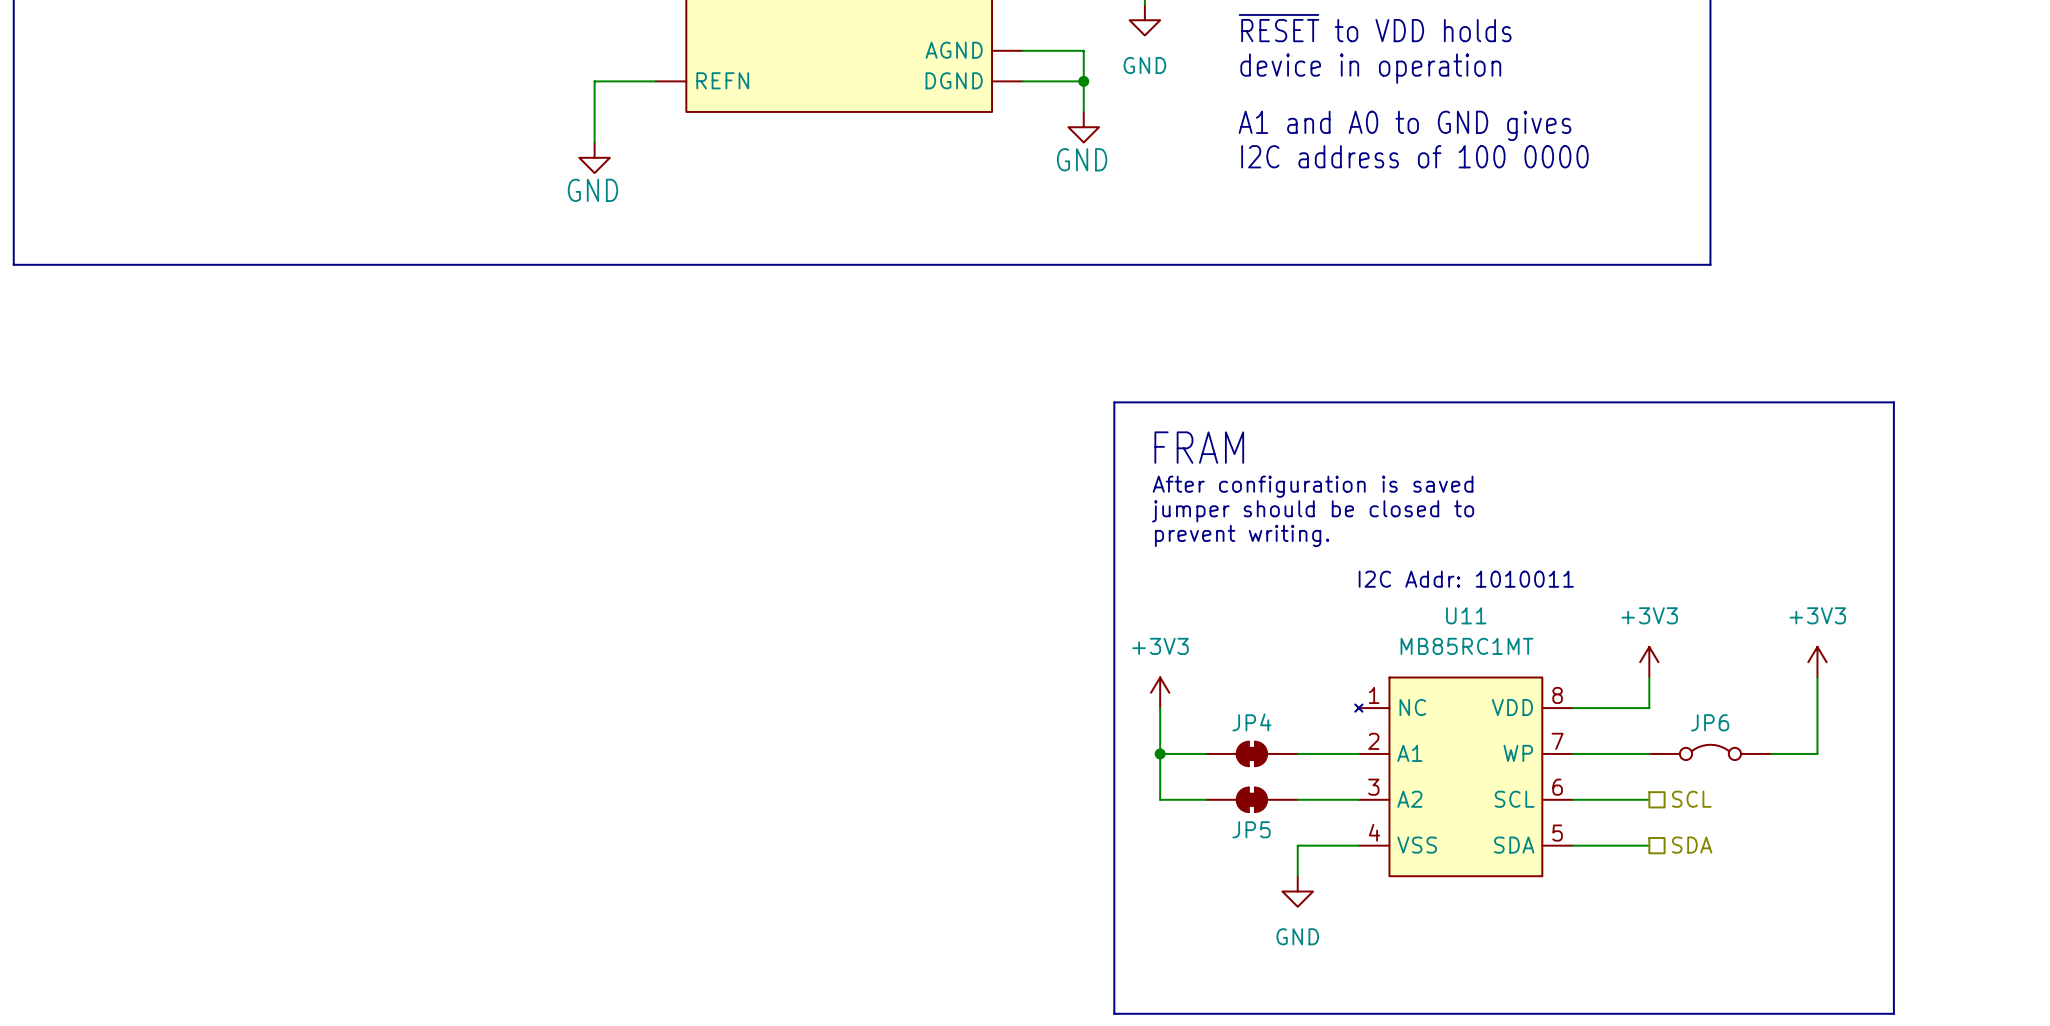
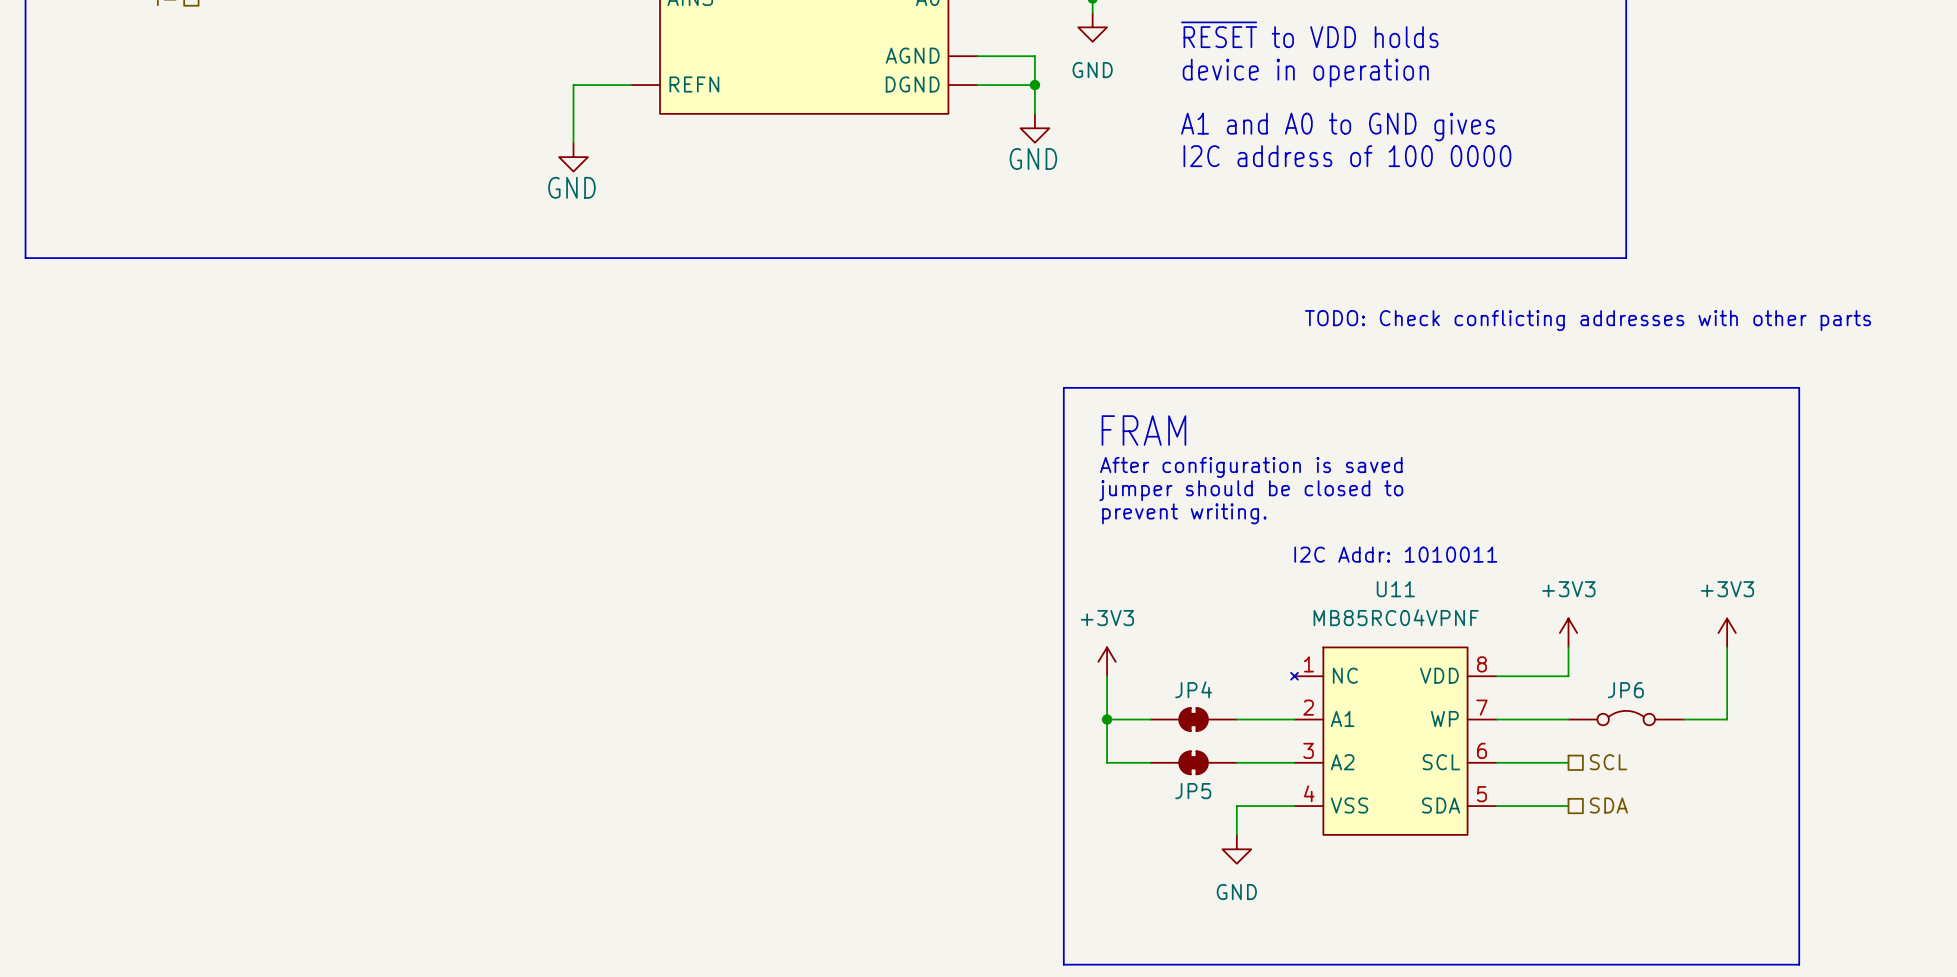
text: none -> TODO: Check conflicting addresses with other parts (1588, 320)
U11 value: MB85RC1MT (1466, 646) -> MB85RC04VPNF (1396, 617)

